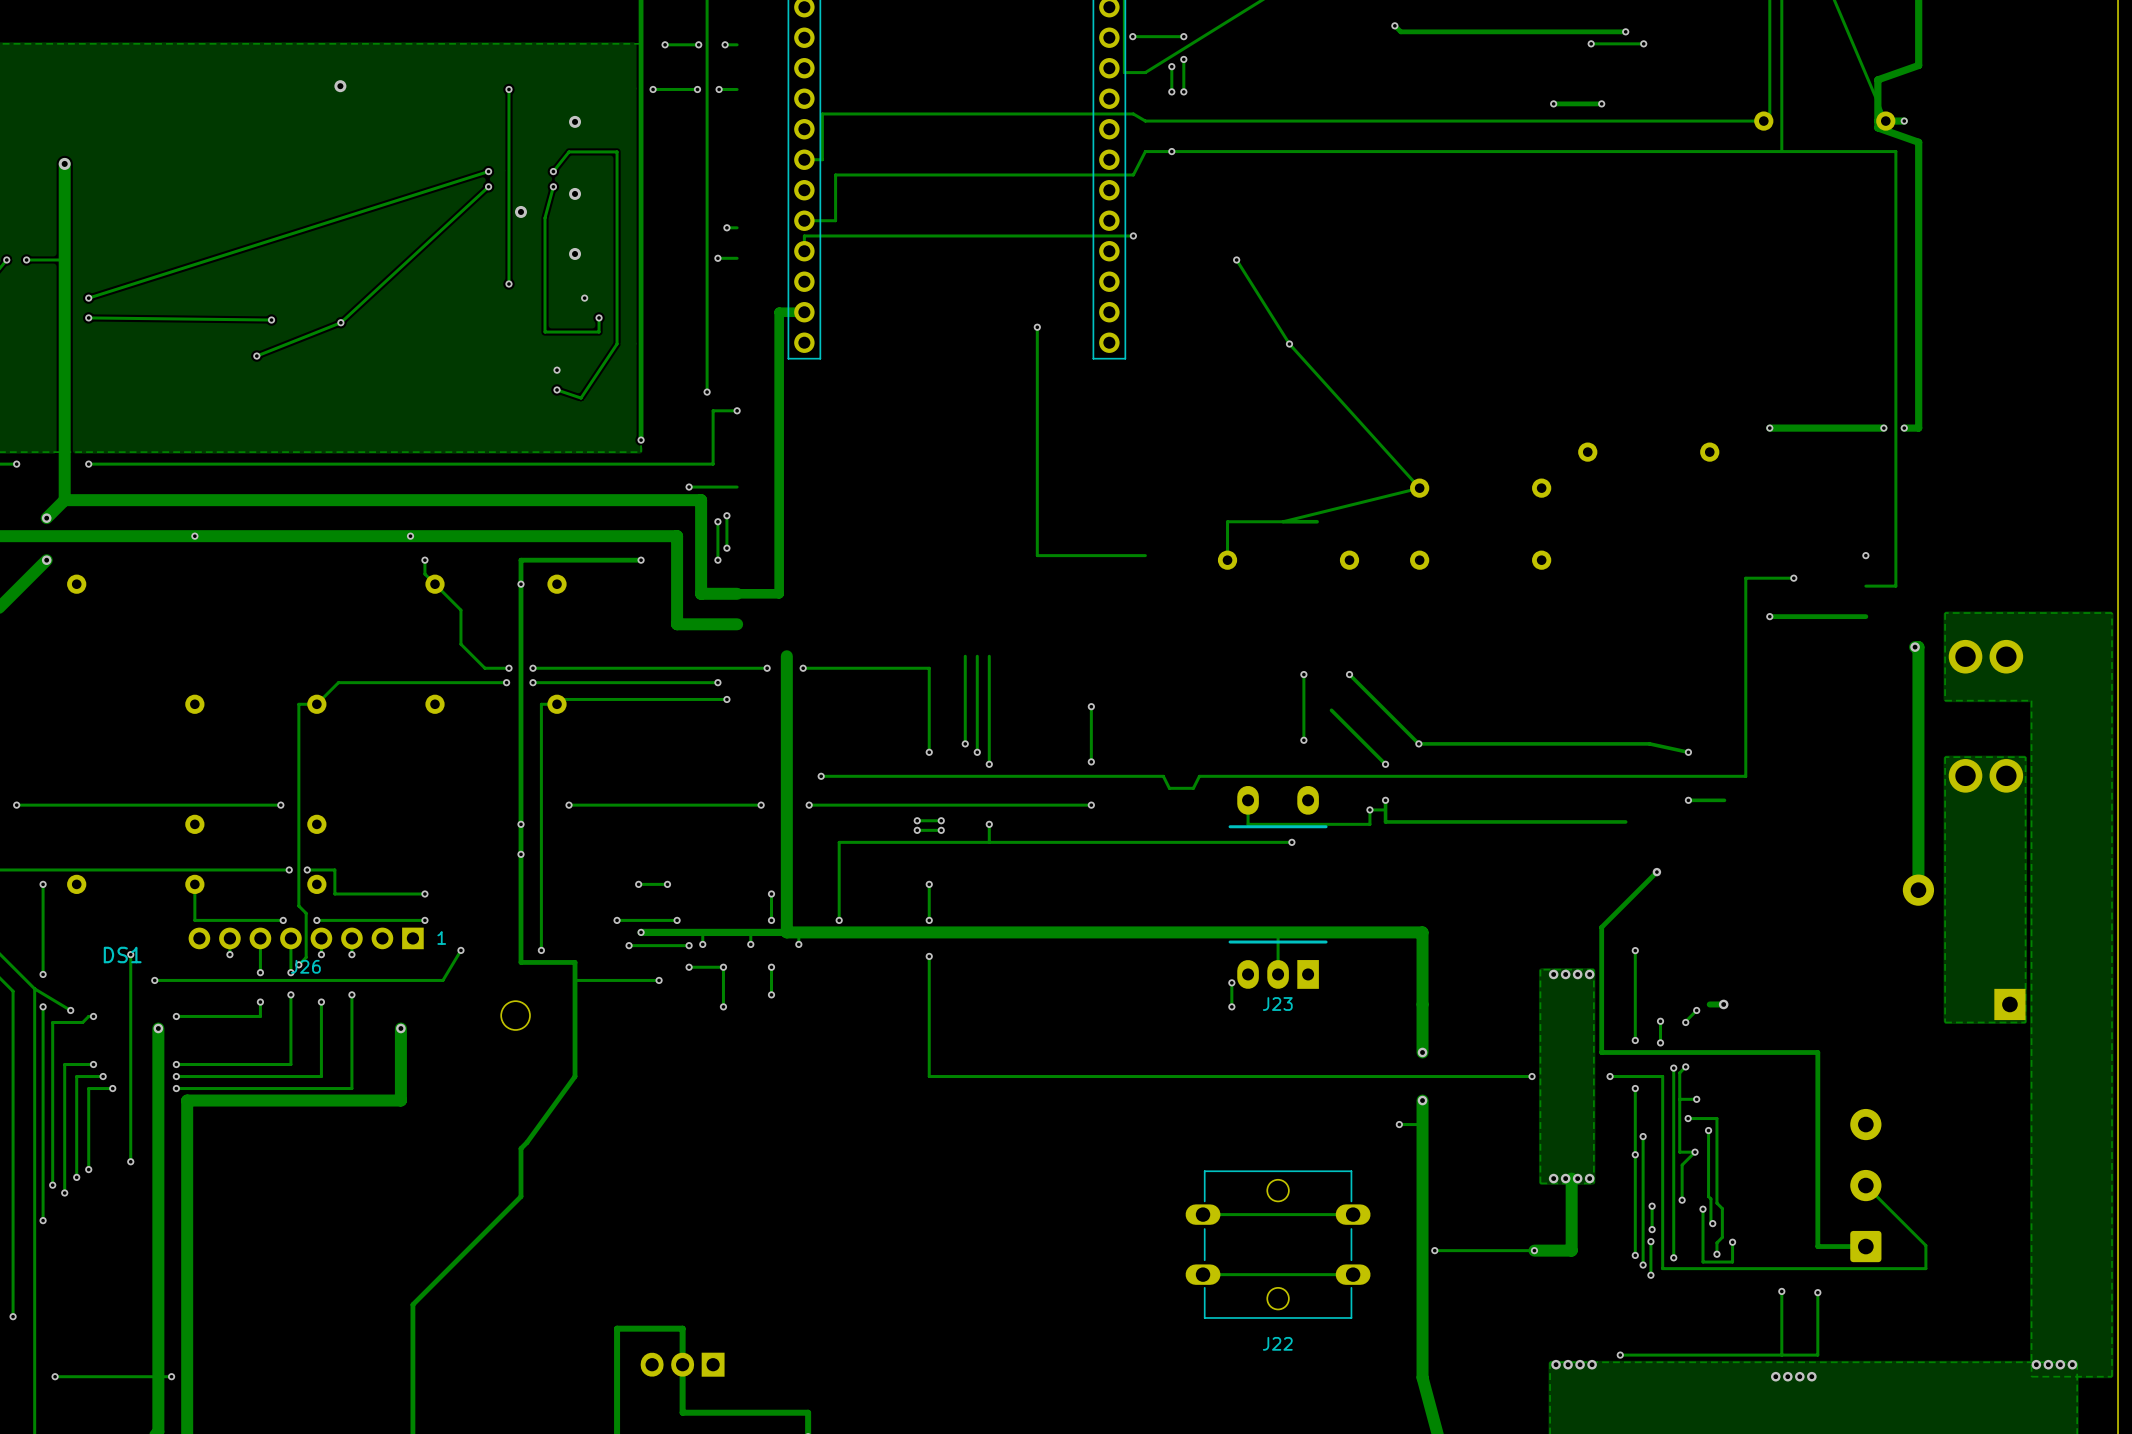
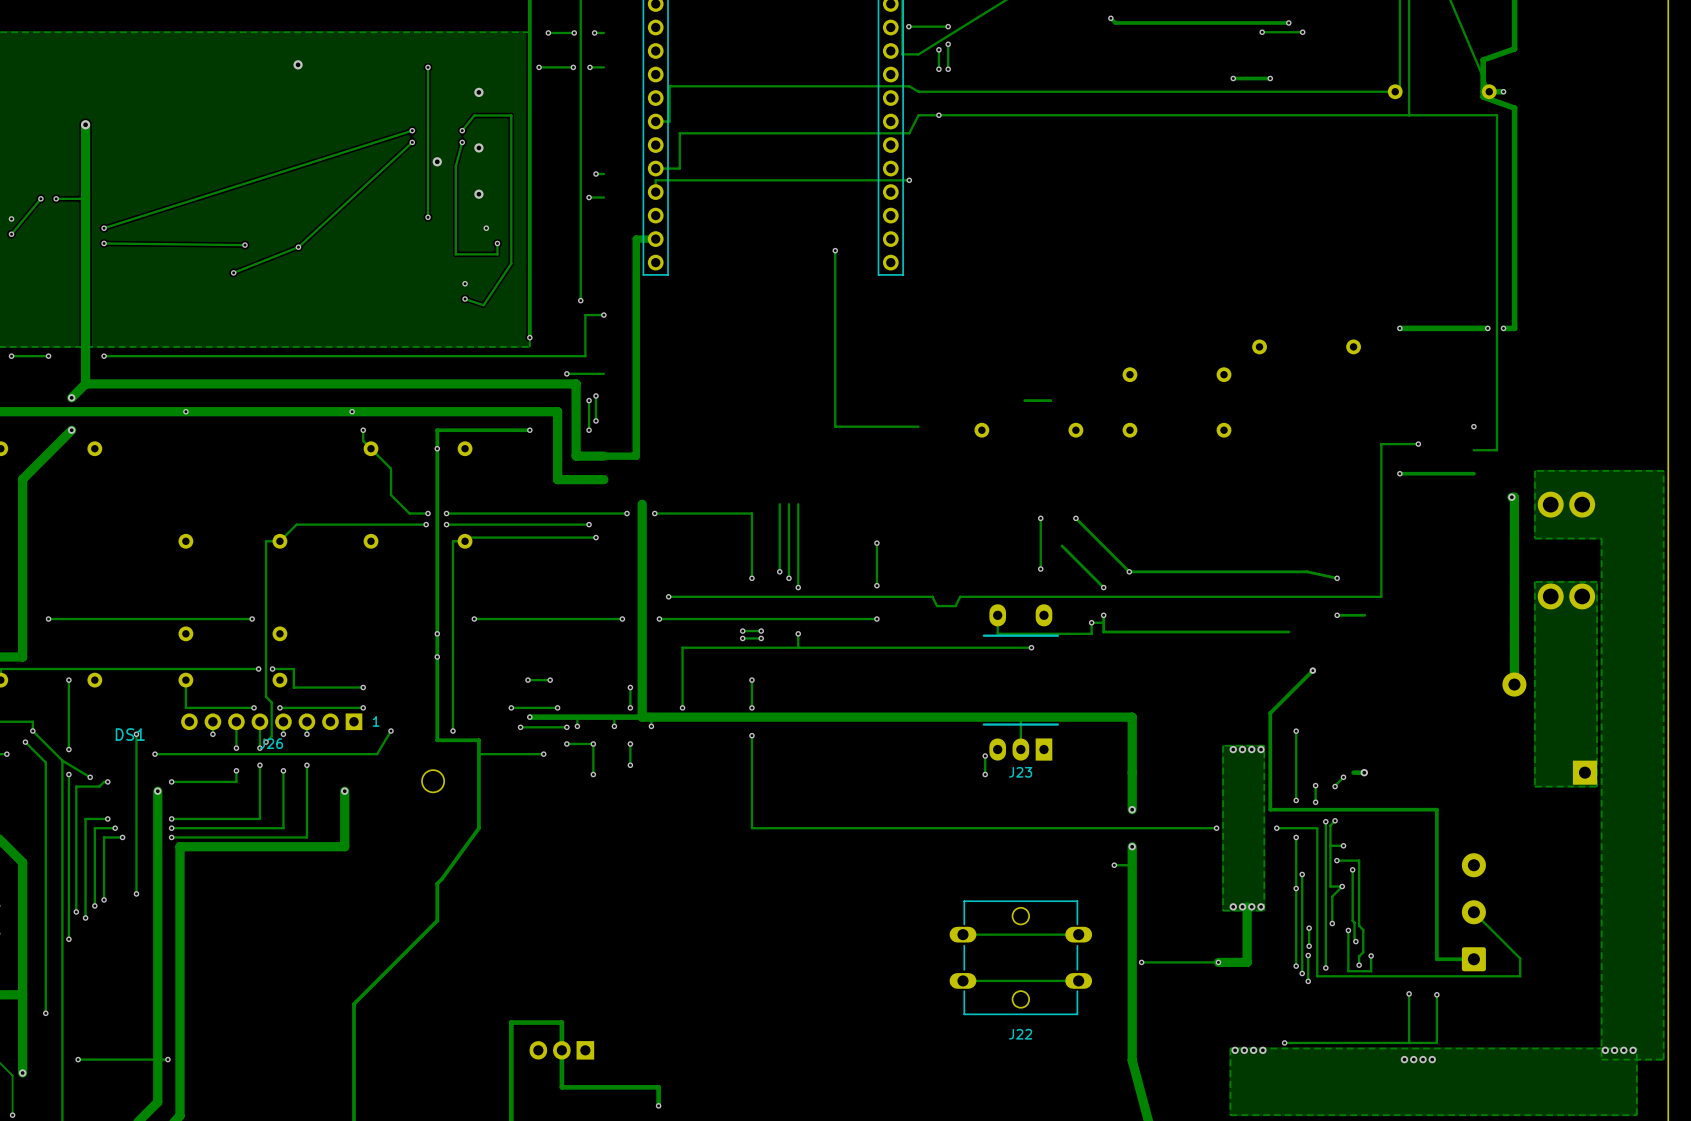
track: (1236, 259) (1289, 344) (1419, 488) (1283, 521) (1227, 521) (1227, 560) -> none
via: (1236, 259) -> none
via: (1289, 344) -> none

